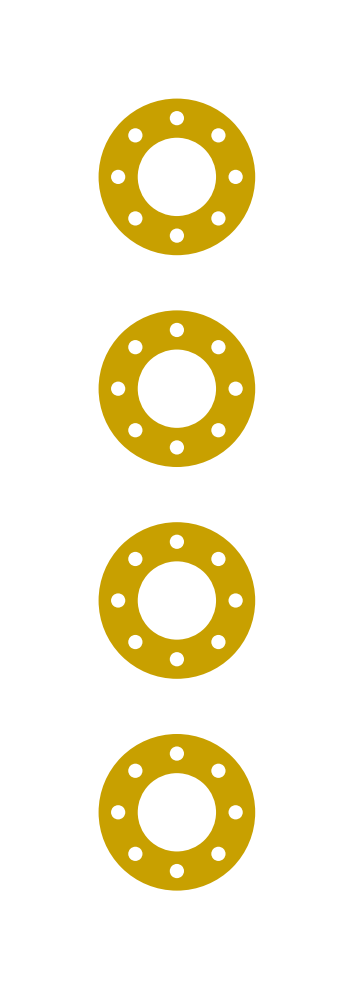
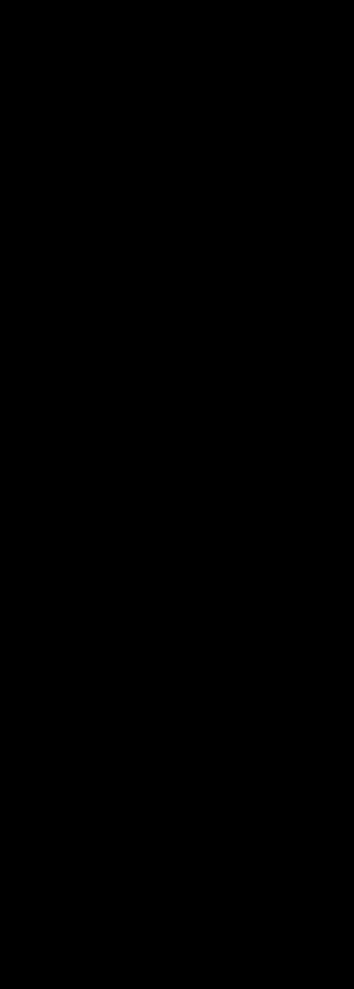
part: (176, 176) -> none
part: (176, 388) -> none
part: (176, 600) -> none
part: (176, 812) -> none

